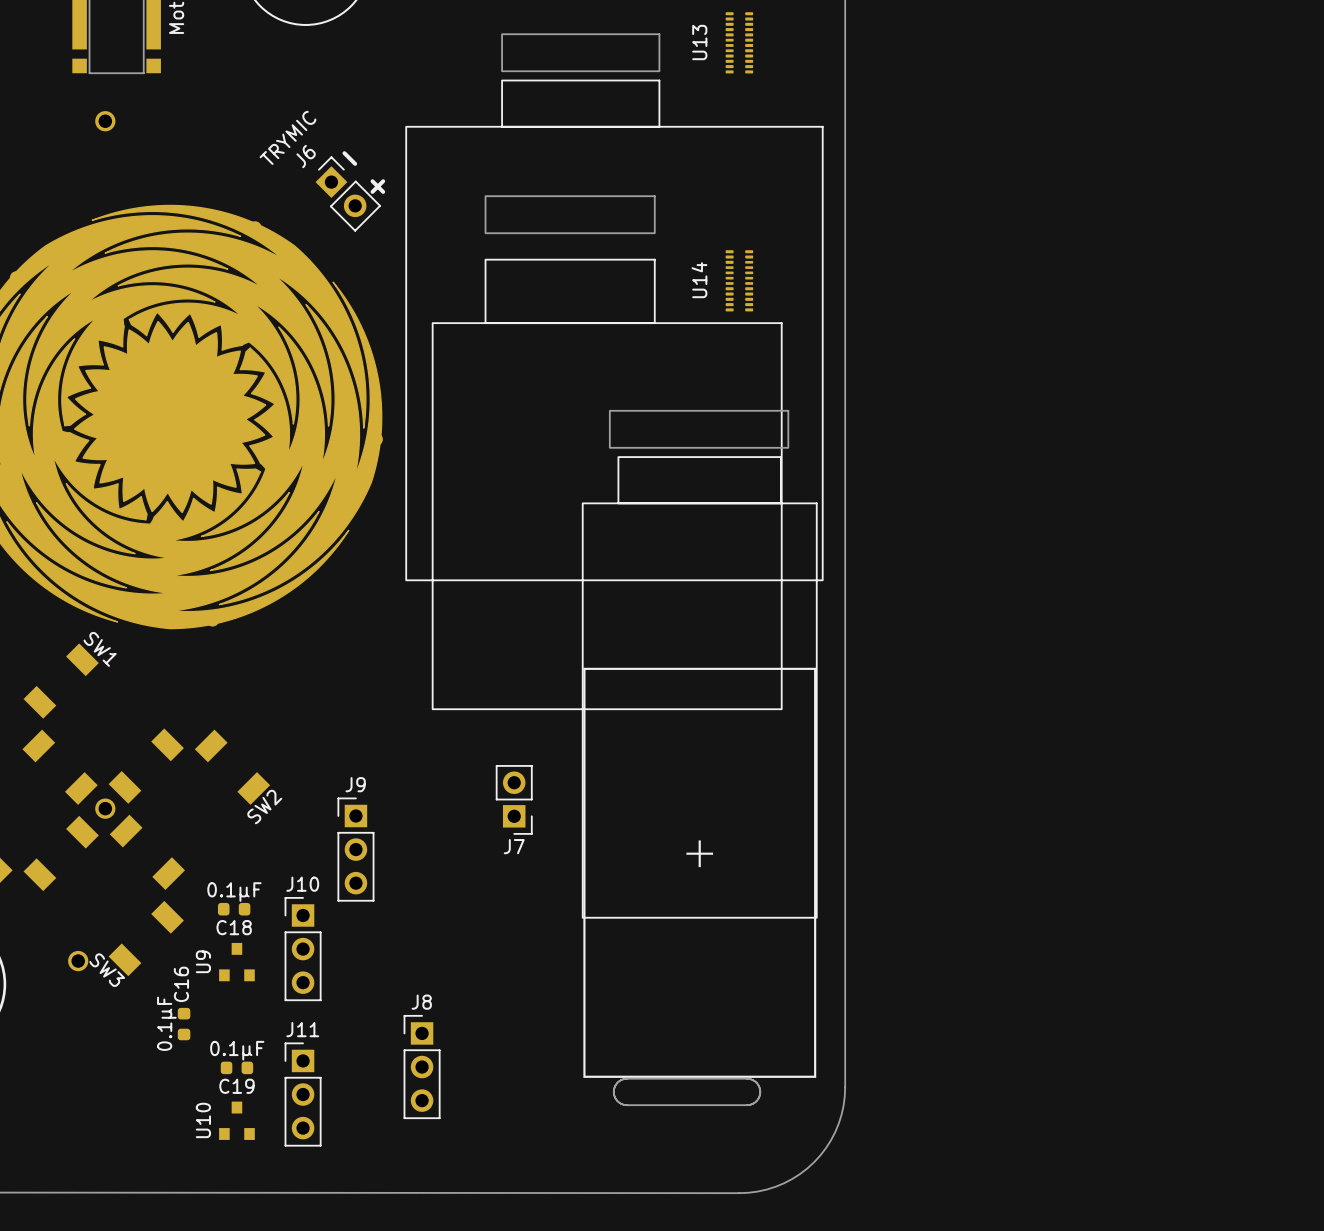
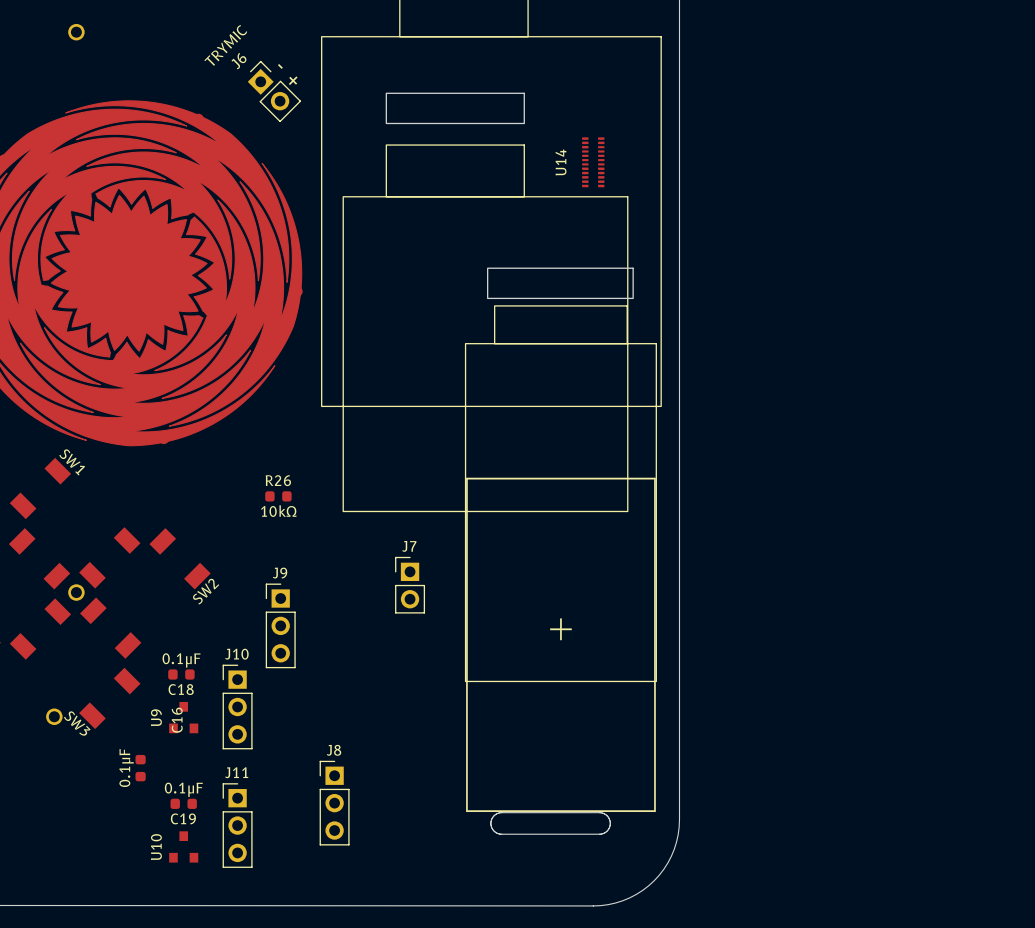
R26: none -> 10kΩ (278, 496)
J7 rotation: 0° (514, 799) -> 180° (410, 585)
C16 name position: C16 (181, 984) -> C16 (177, 720)

